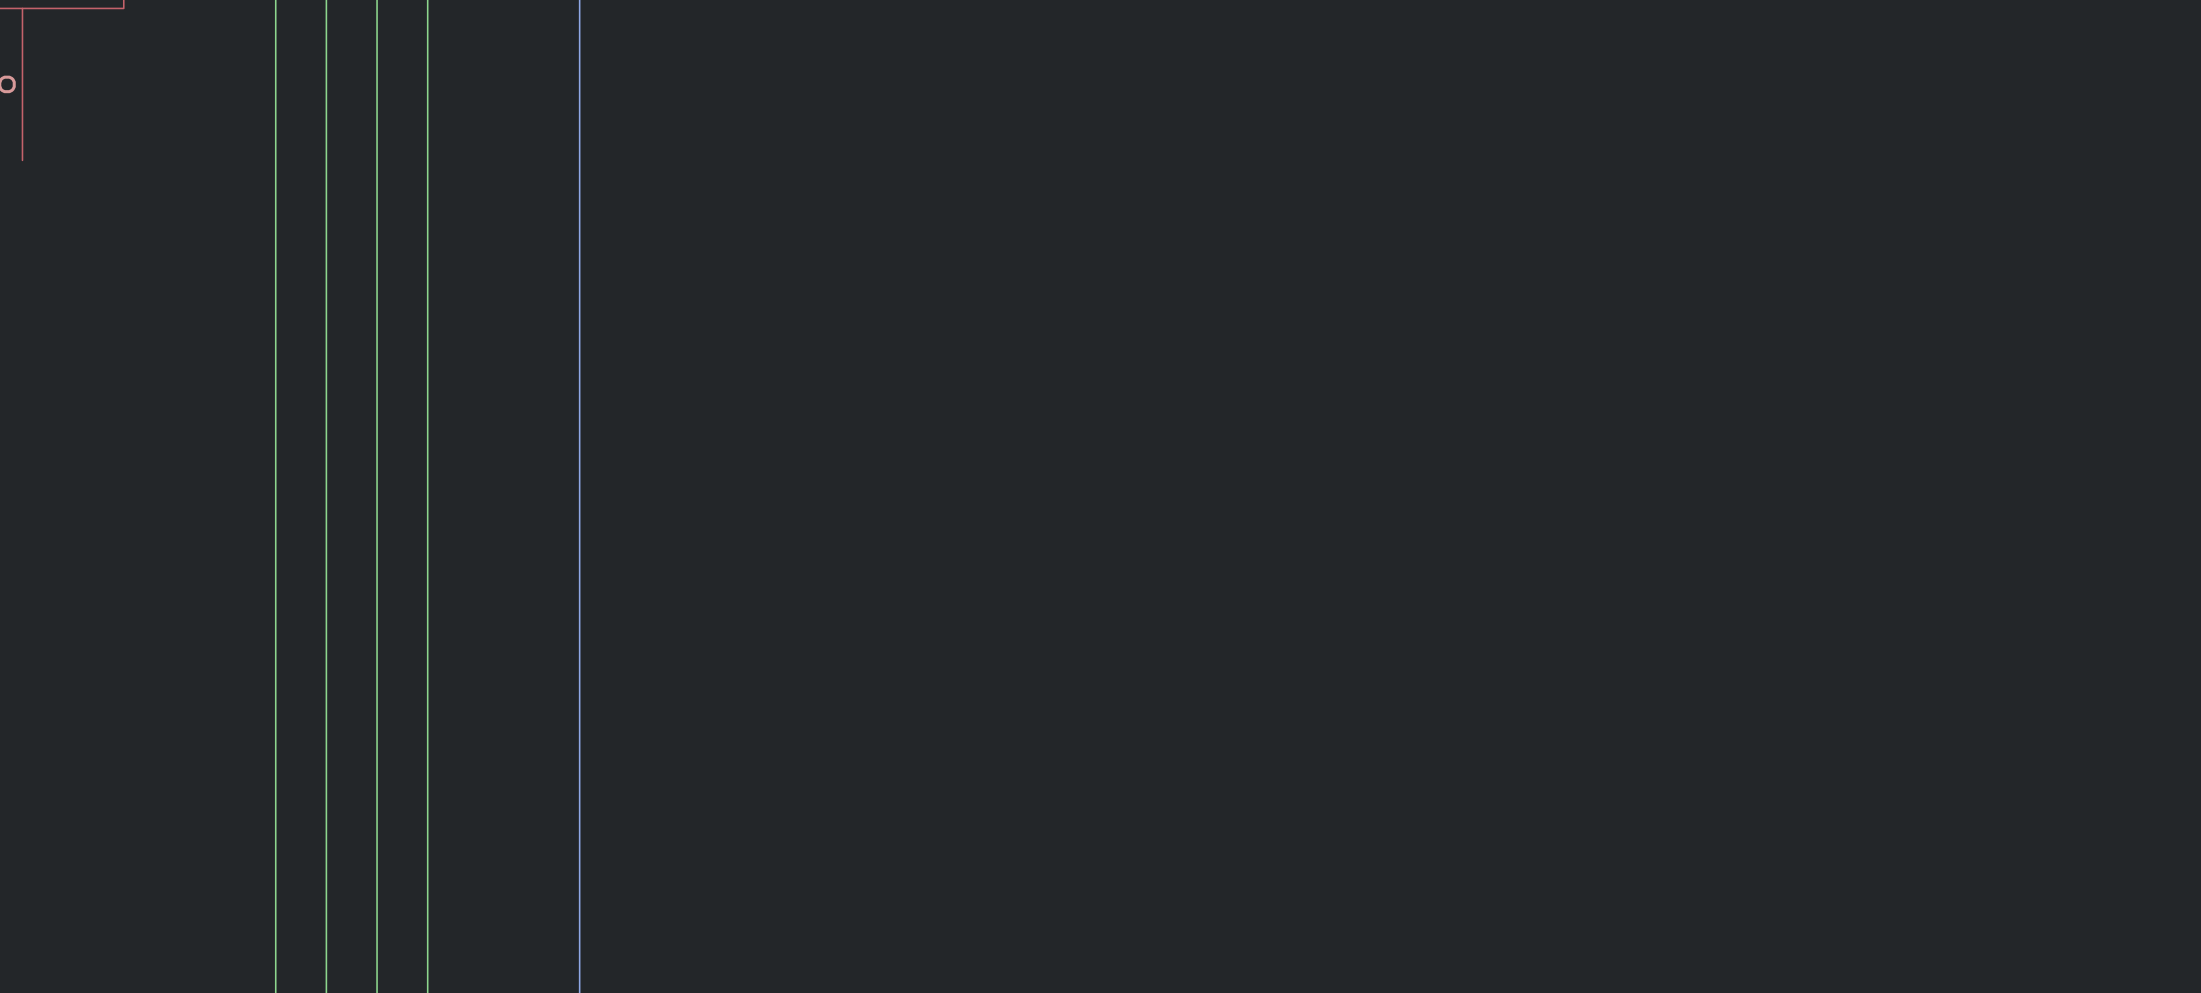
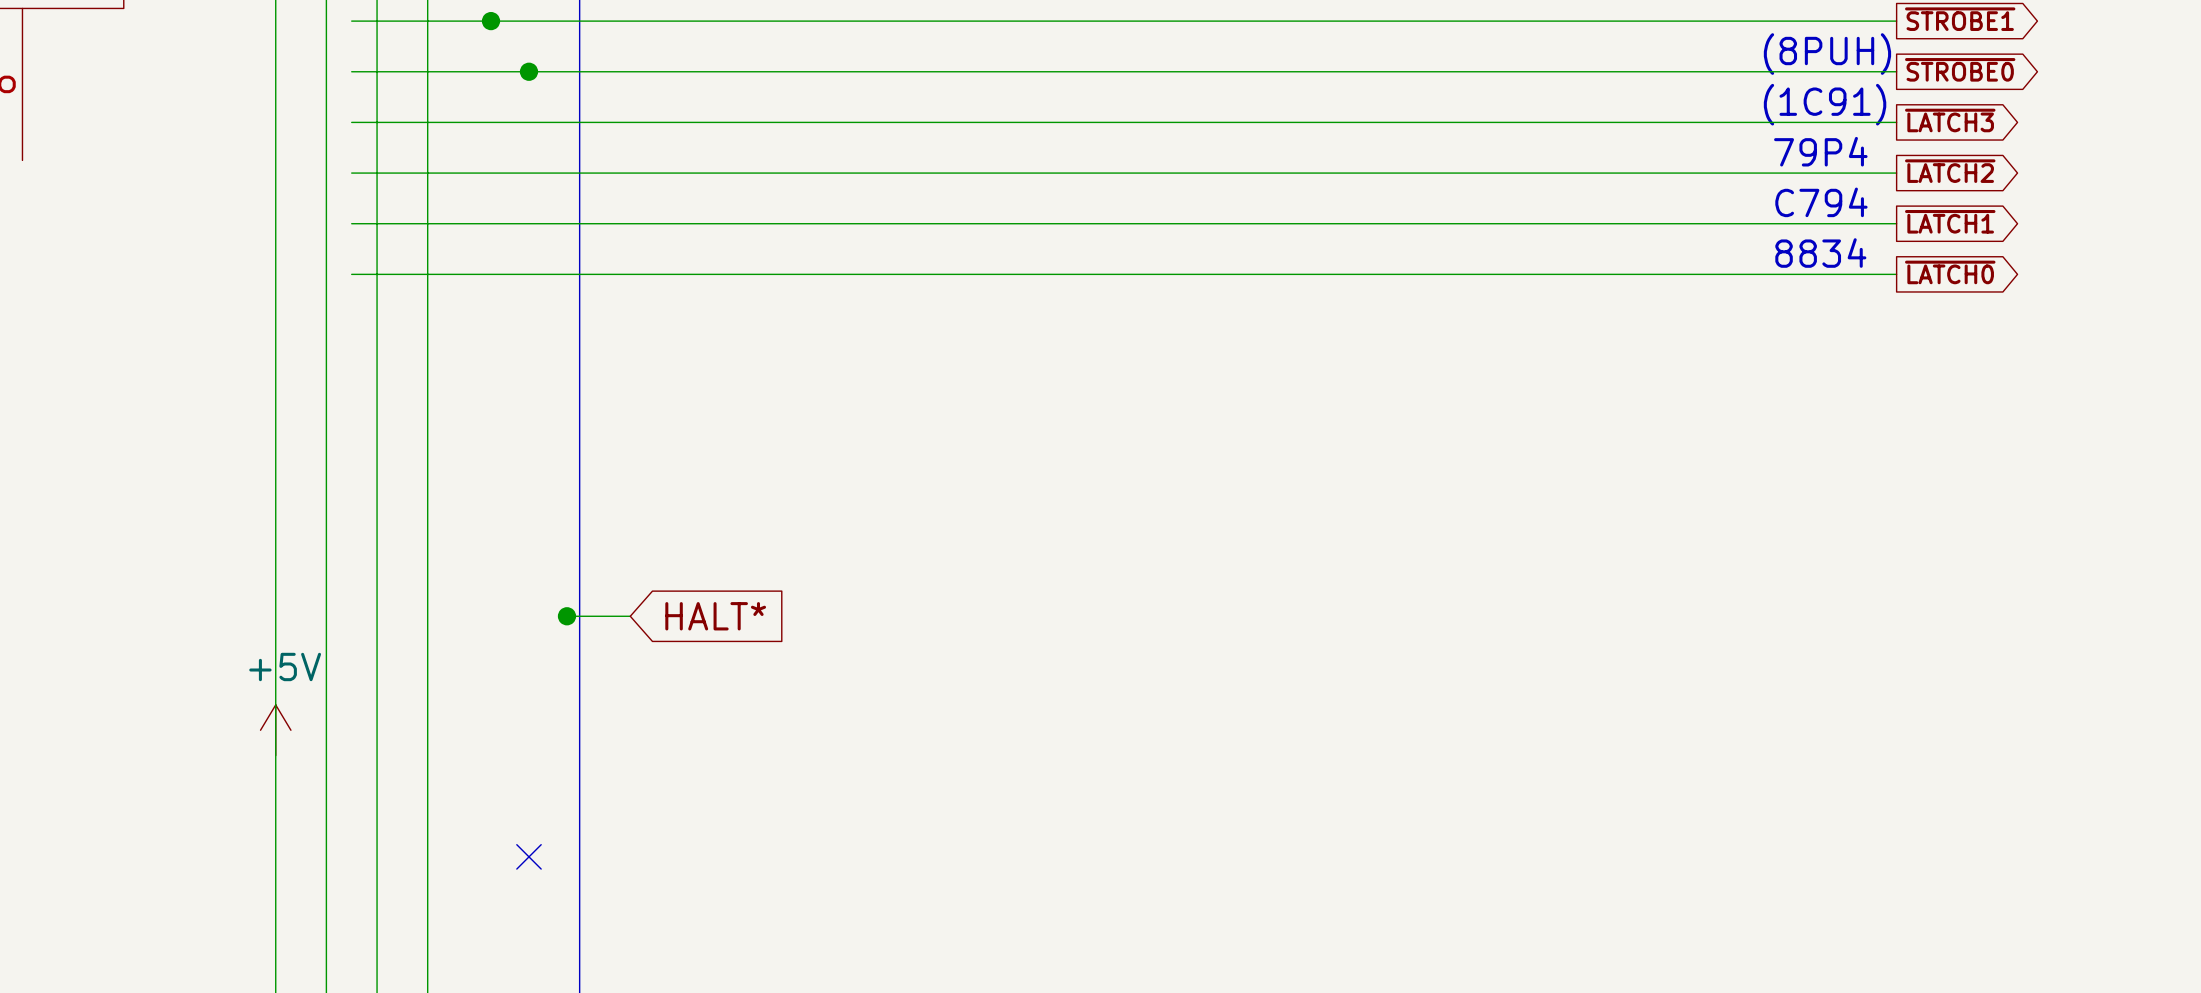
global label: none -> ~{STROBE1} (1960, 19)
wire: none -> (351, 21) (1896, 21)
junction: none -> (491, 21)
text: none -> (8PUH) (1827, 54)
global label: none -> ~{STROBE0} (1960, 69)
wire: none -> (351, 71) (1896, 71)
junction: none -> (528, 71)
text: none -> (1C91) (1825, 104)
global label: none -> ~{LATCH3} (1950, 120)
wire: none -> (351, 122) (1896, 122)
text: none -> 79P4 (1820, 151)
global label: none -> ~{LATCH2} (1950, 171)
wire: none -> (351, 173) (1896, 173)
text: none -> C794 (1821, 202)
global label: none -> ~{LATCH1} (1950, 221)
wire: none -> (351, 223) (1896, 223)
text: none -> 8834 (1820, 253)
global label: none -> ~{LATCH0} (1950, 272)
wire: none -> (351, 274) (1896, 274)
wire: none -> (566, 616) (630, 616)
junction: none -> (566, 616)
global label: none -> HALT* (715, 616)
power symbol: none -> +5V (275, 730)
no-connect mark: none -> (528, 856)

